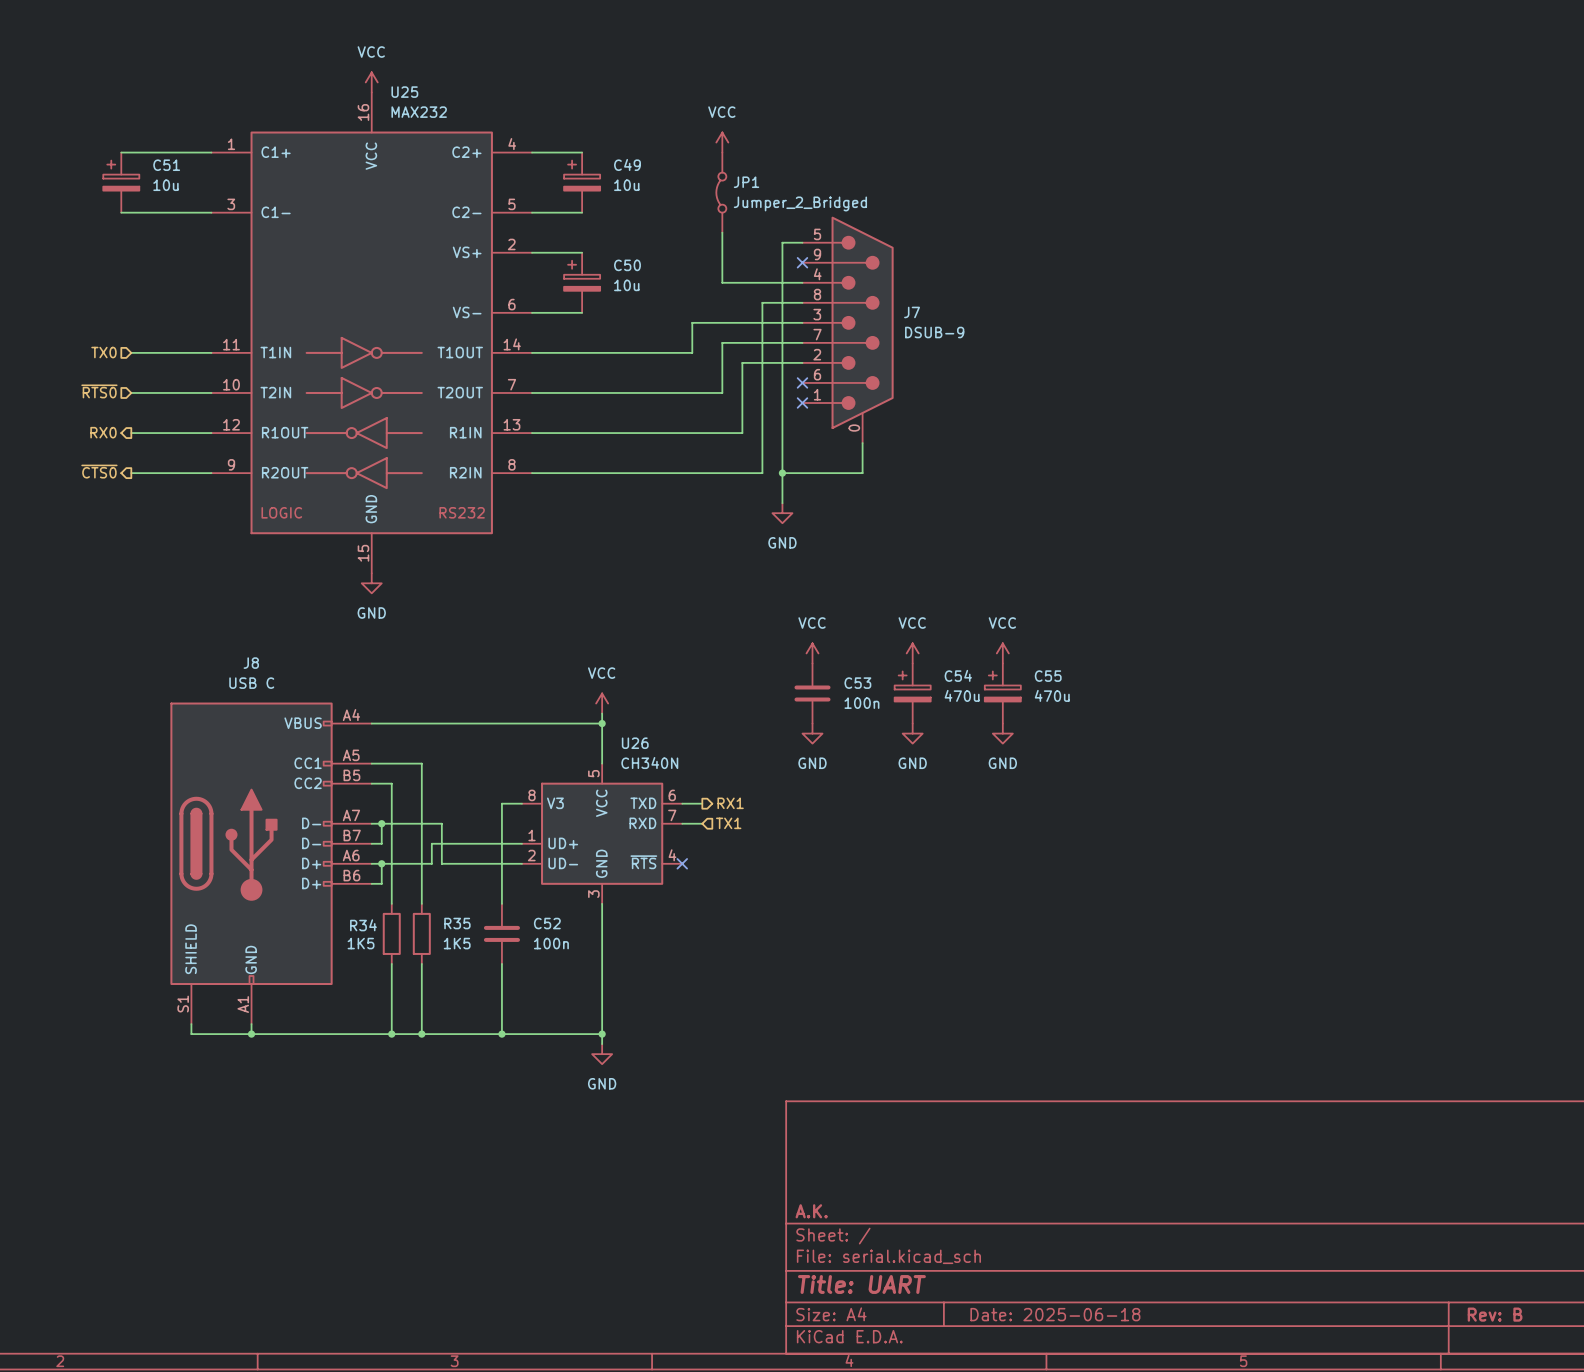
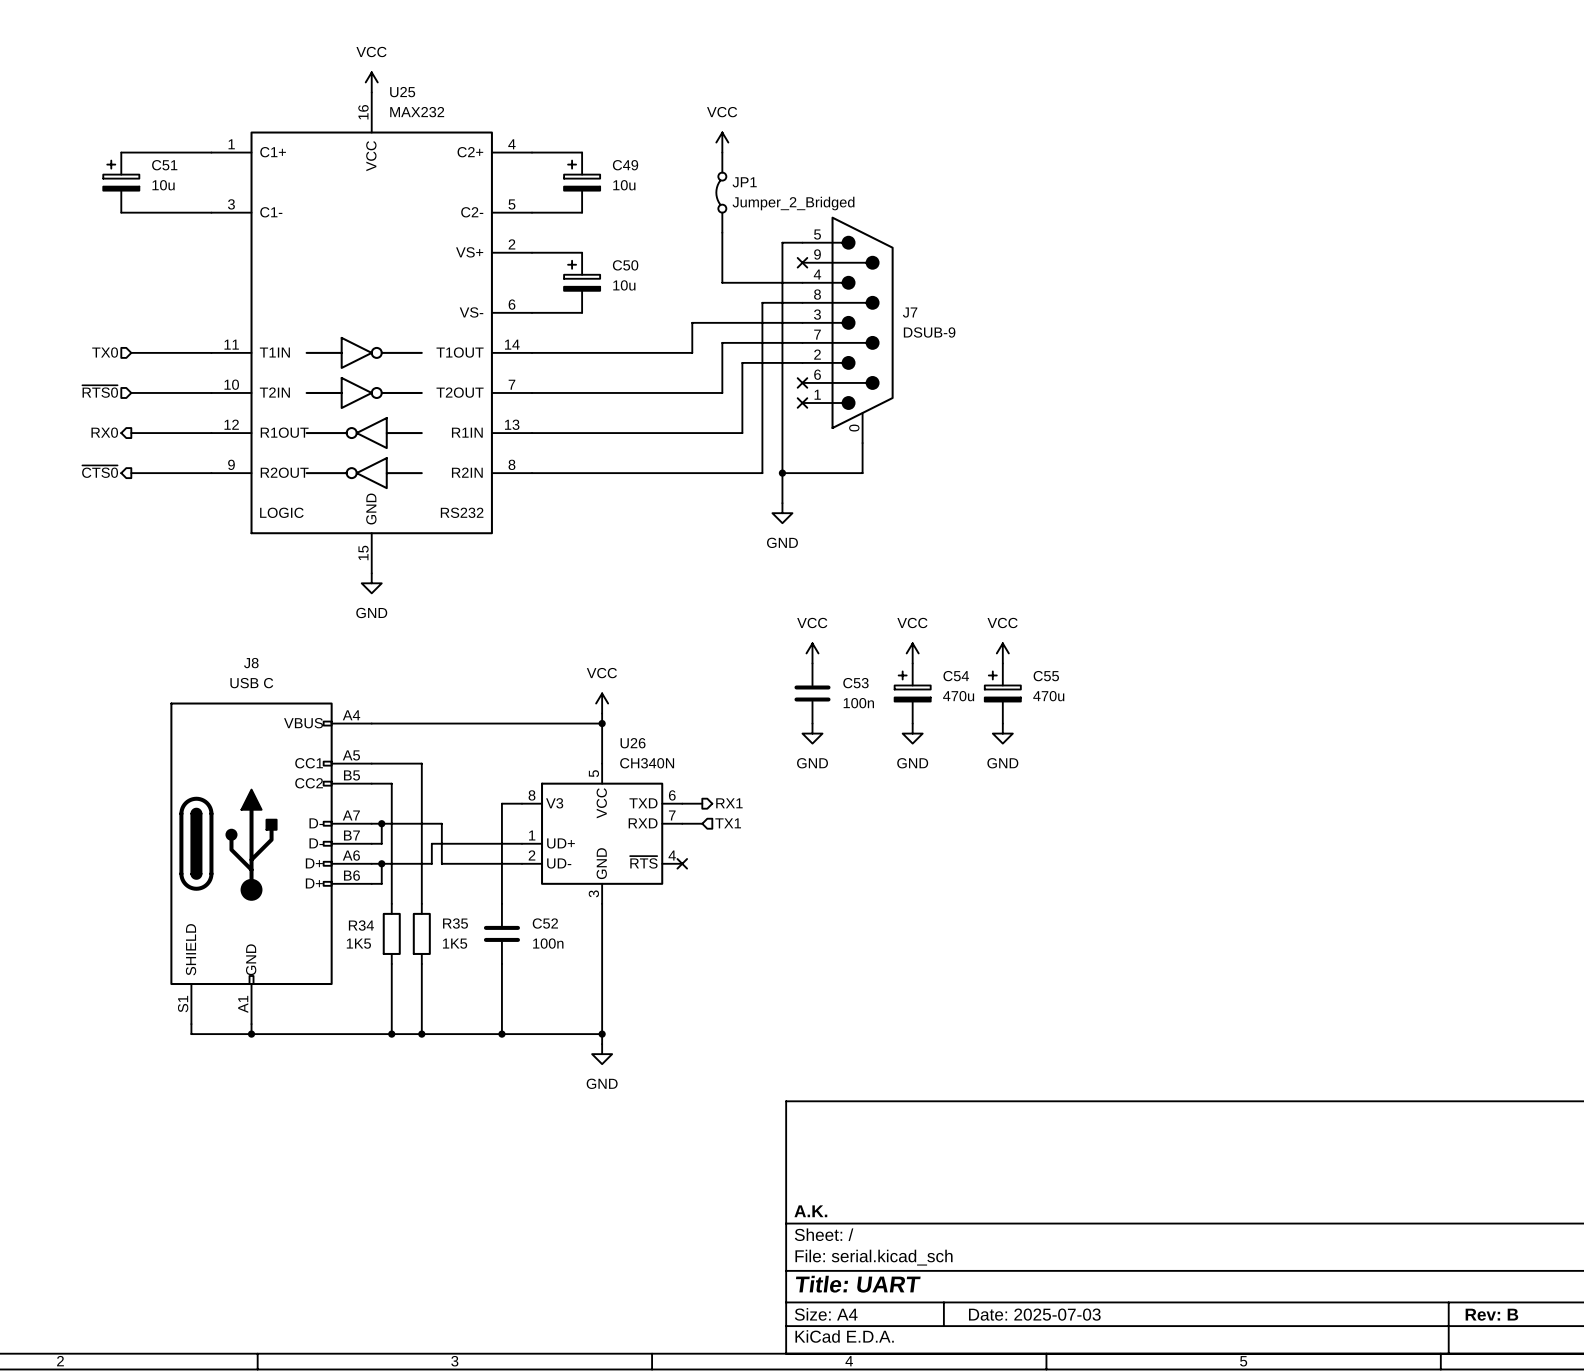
title block: Date: 2025-06-18 (1055, 1314) -> Date: 2025-07-03 (1034, 1314)

